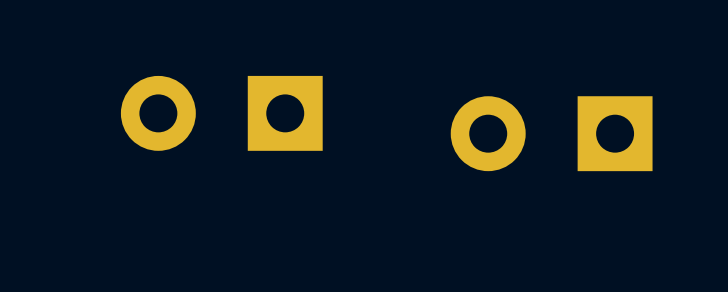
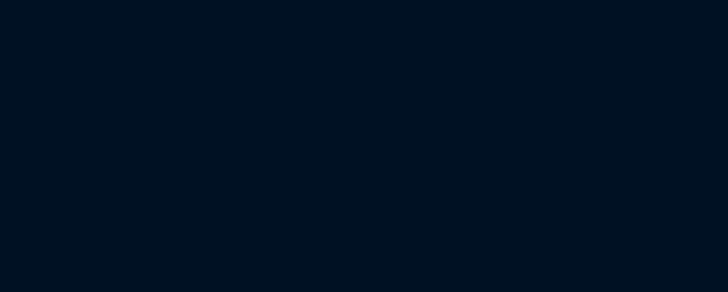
part: (221, 113) -> none
part: (551, 133) -> none

